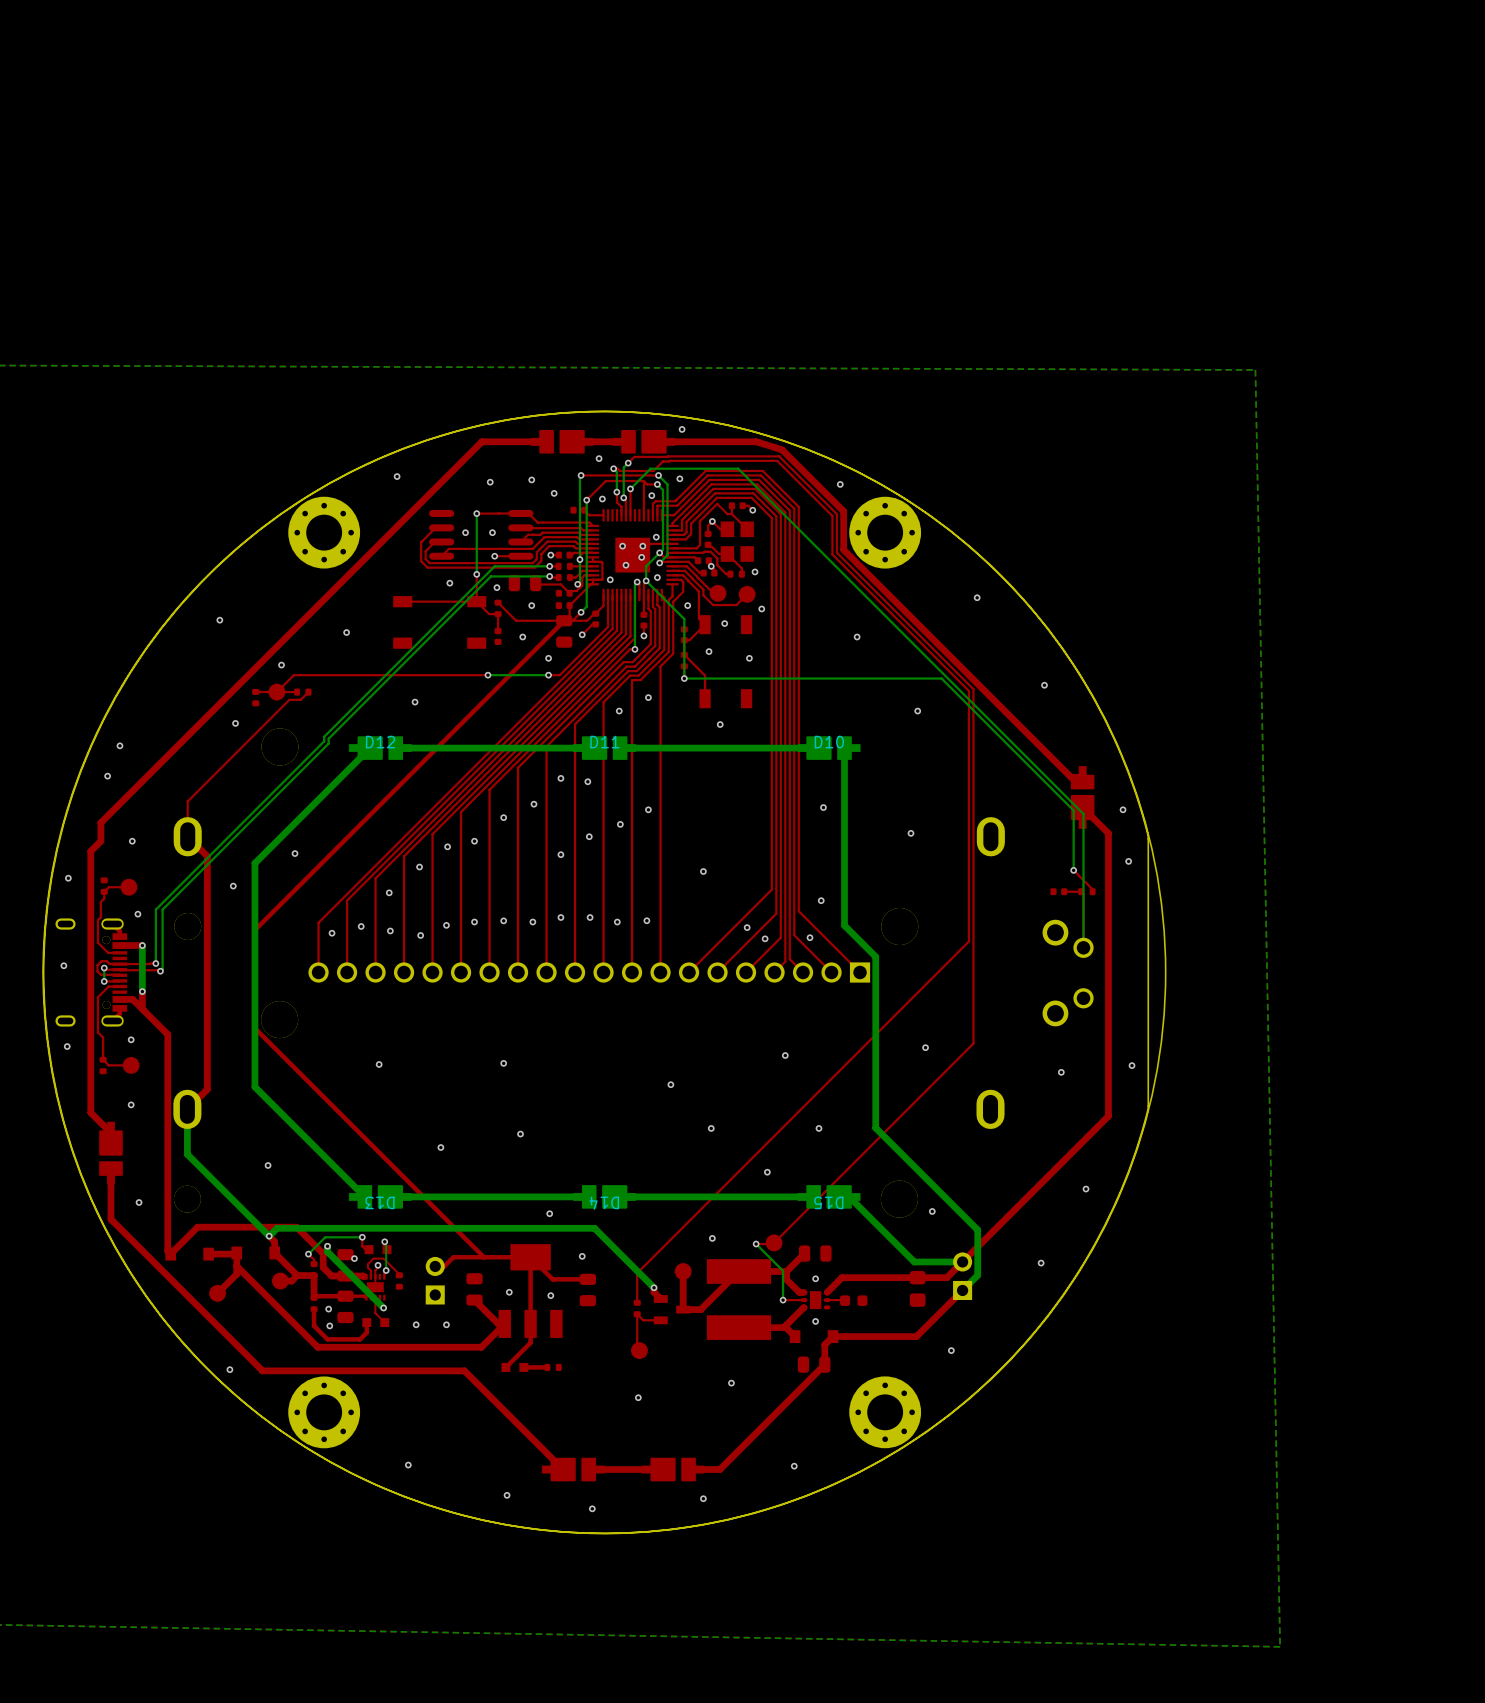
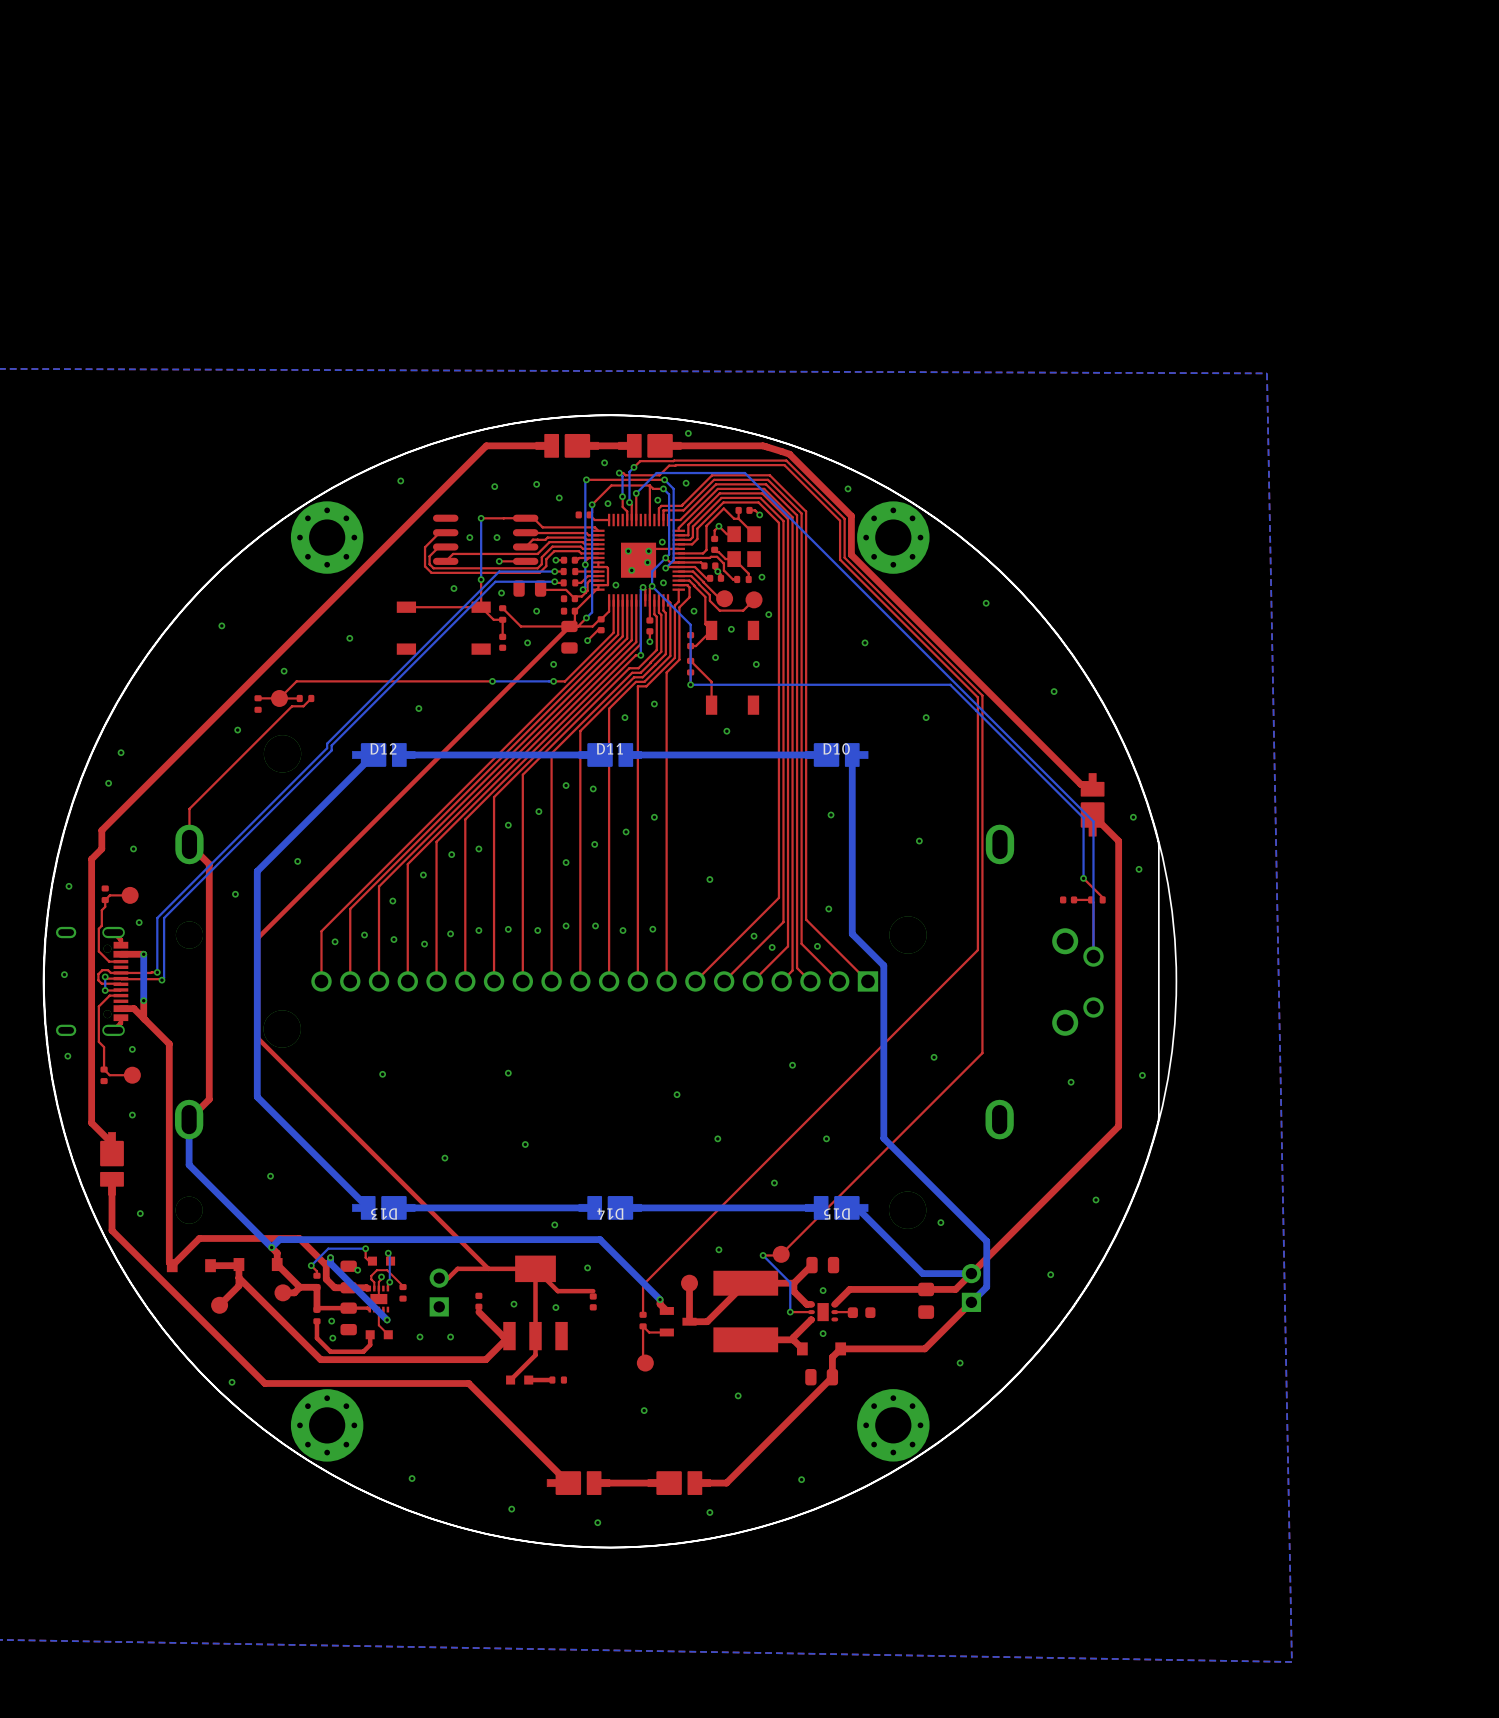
part footprint: [466, 1273, 483, 1306] -> [475, 1292, 483, 1310]
part footprint: [579, 1273, 596, 1307] -> [589, 1293, 597, 1311]

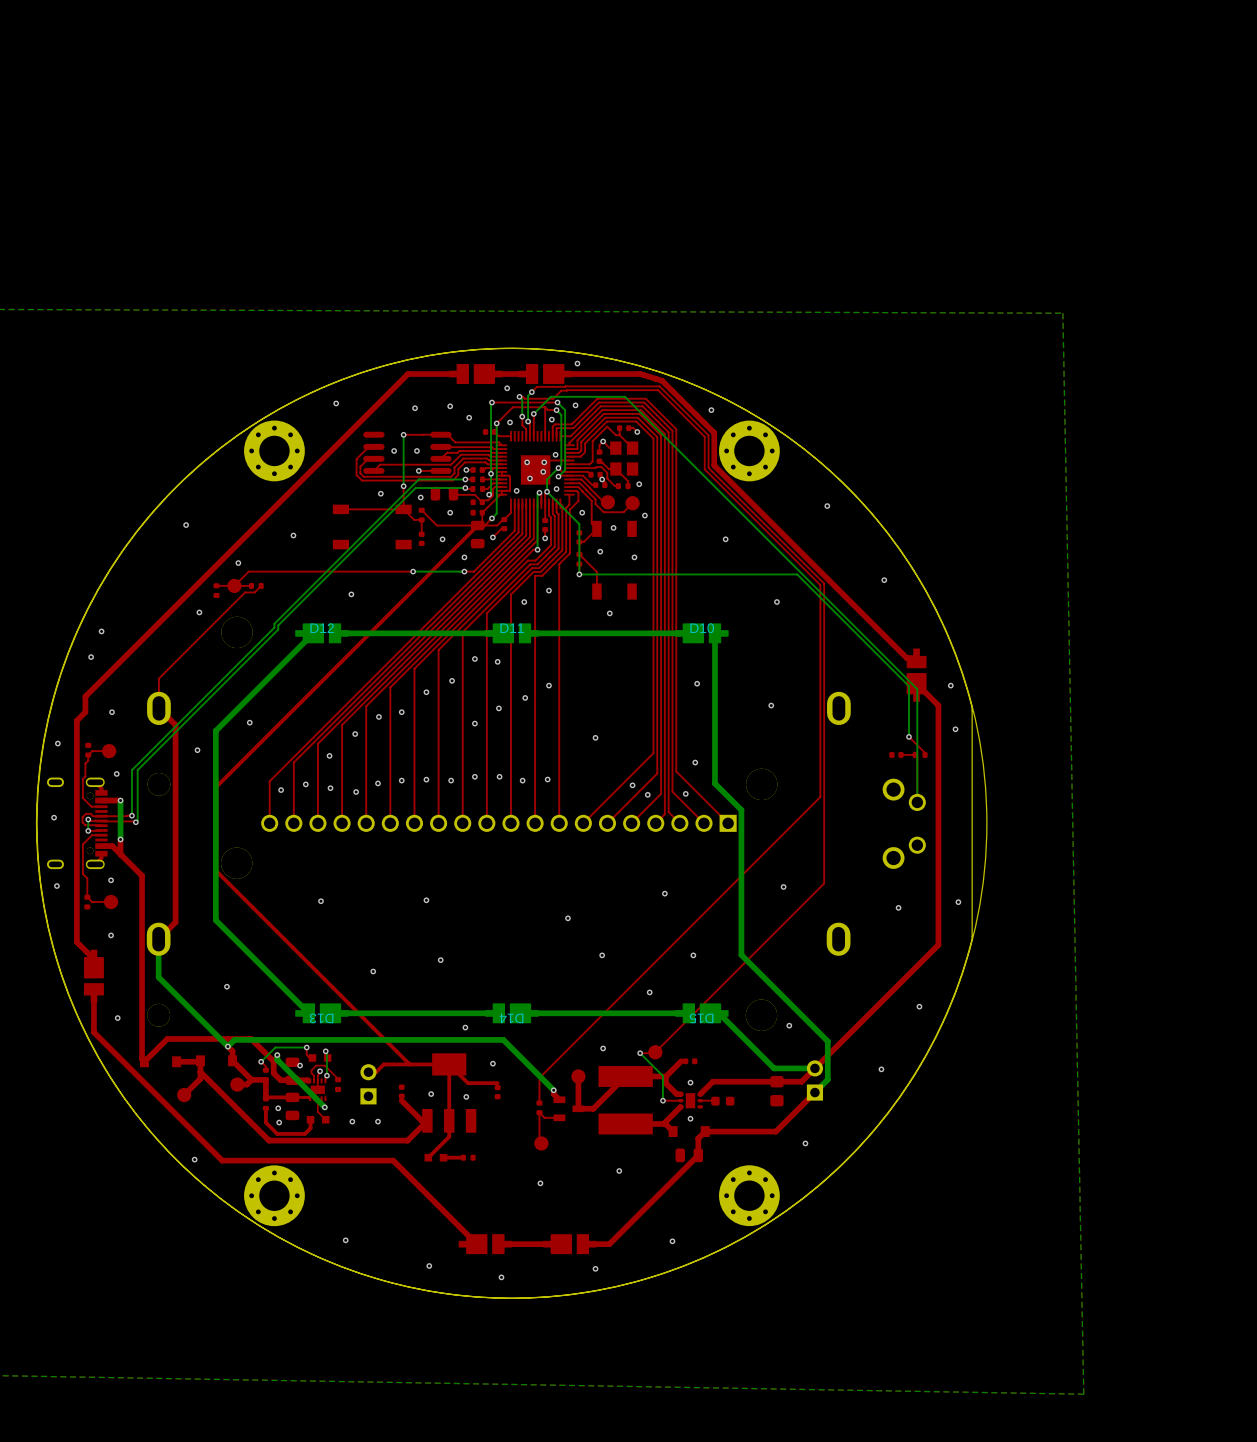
part footprint: [806, 1256, 840, 1274] -> [683, 1058, 698, 1065]

